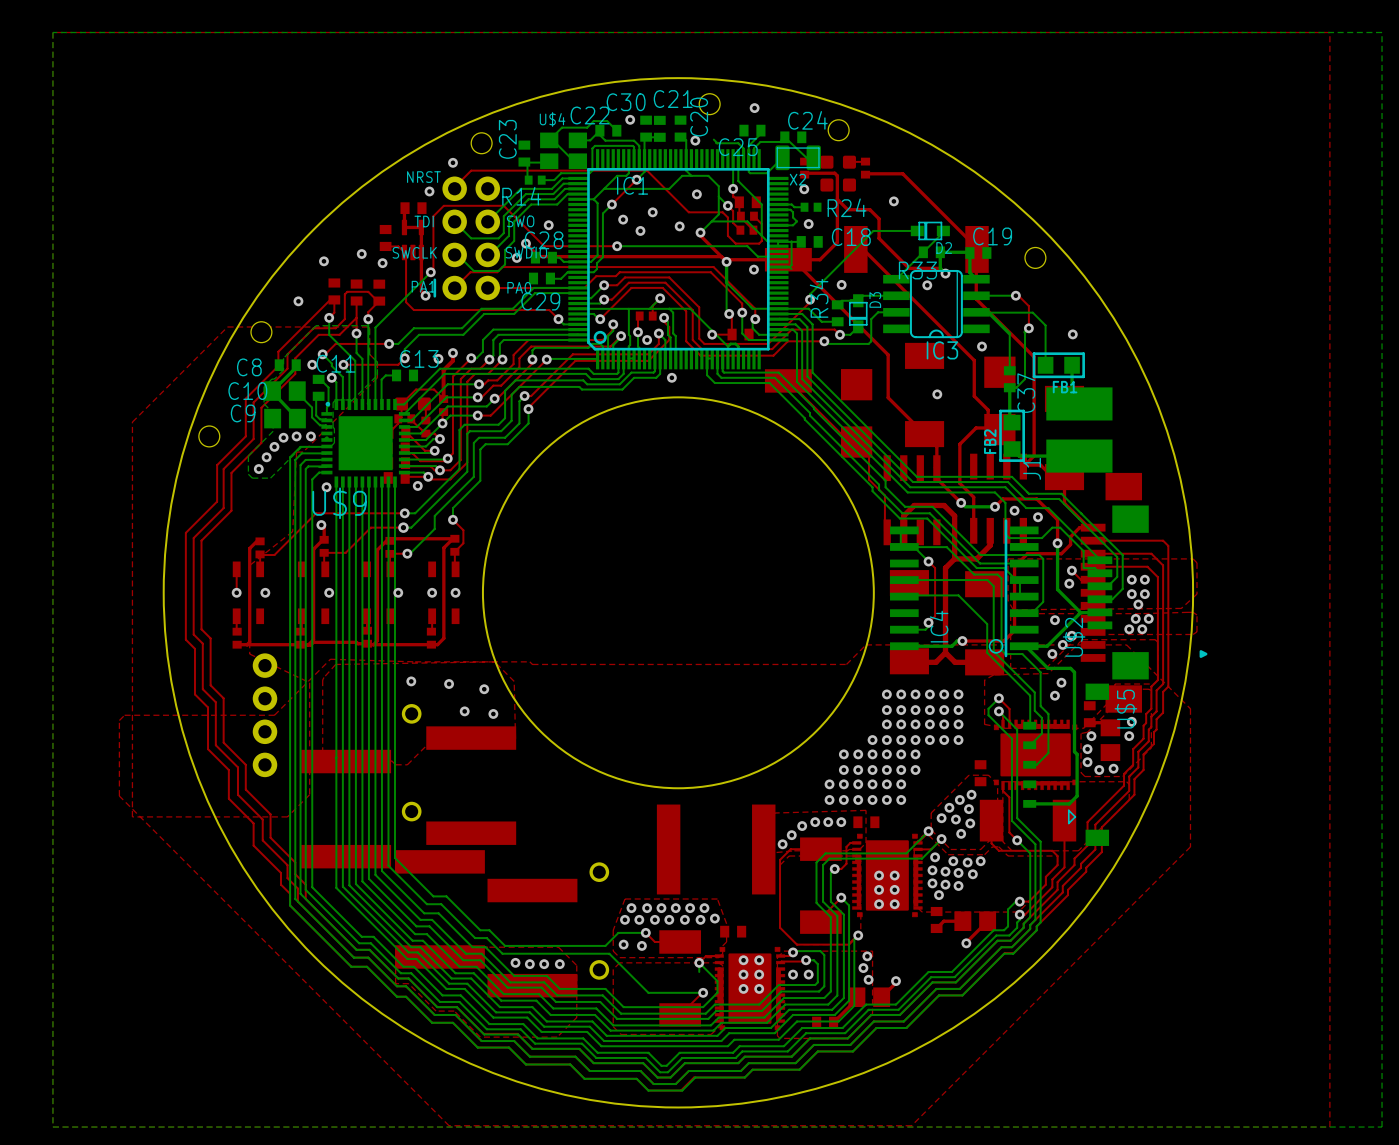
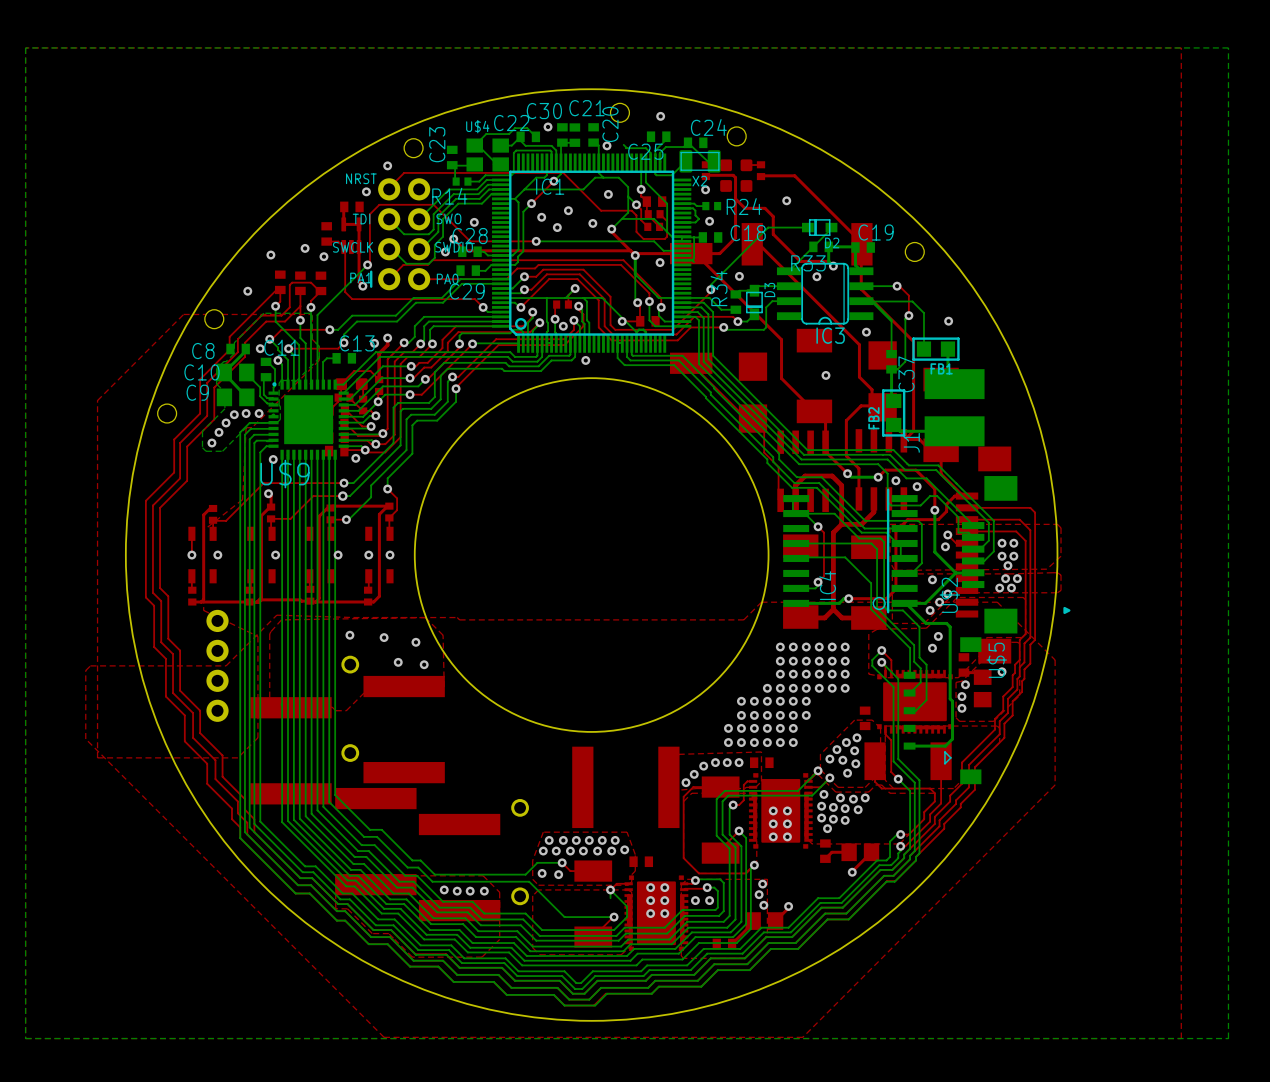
via: (1129, 736) -> none
via: (1113, 768) -> none
via: (1099, 770) -> none

